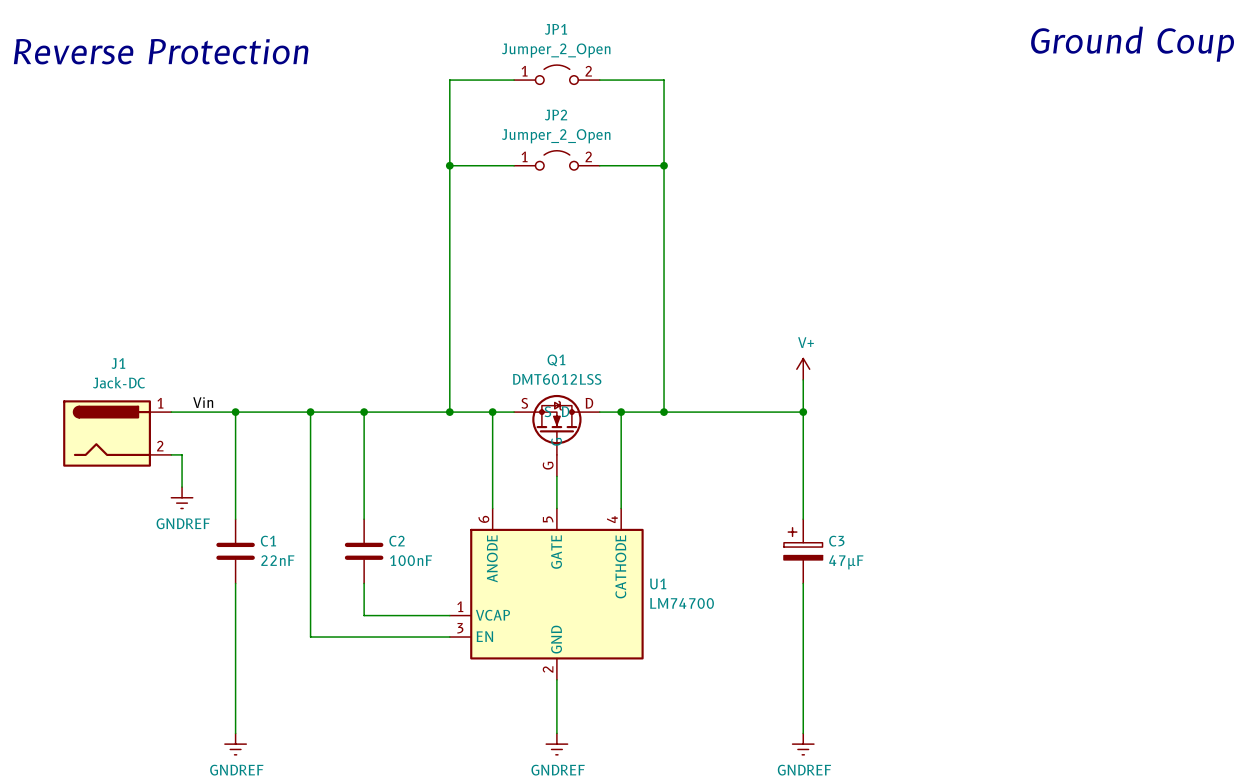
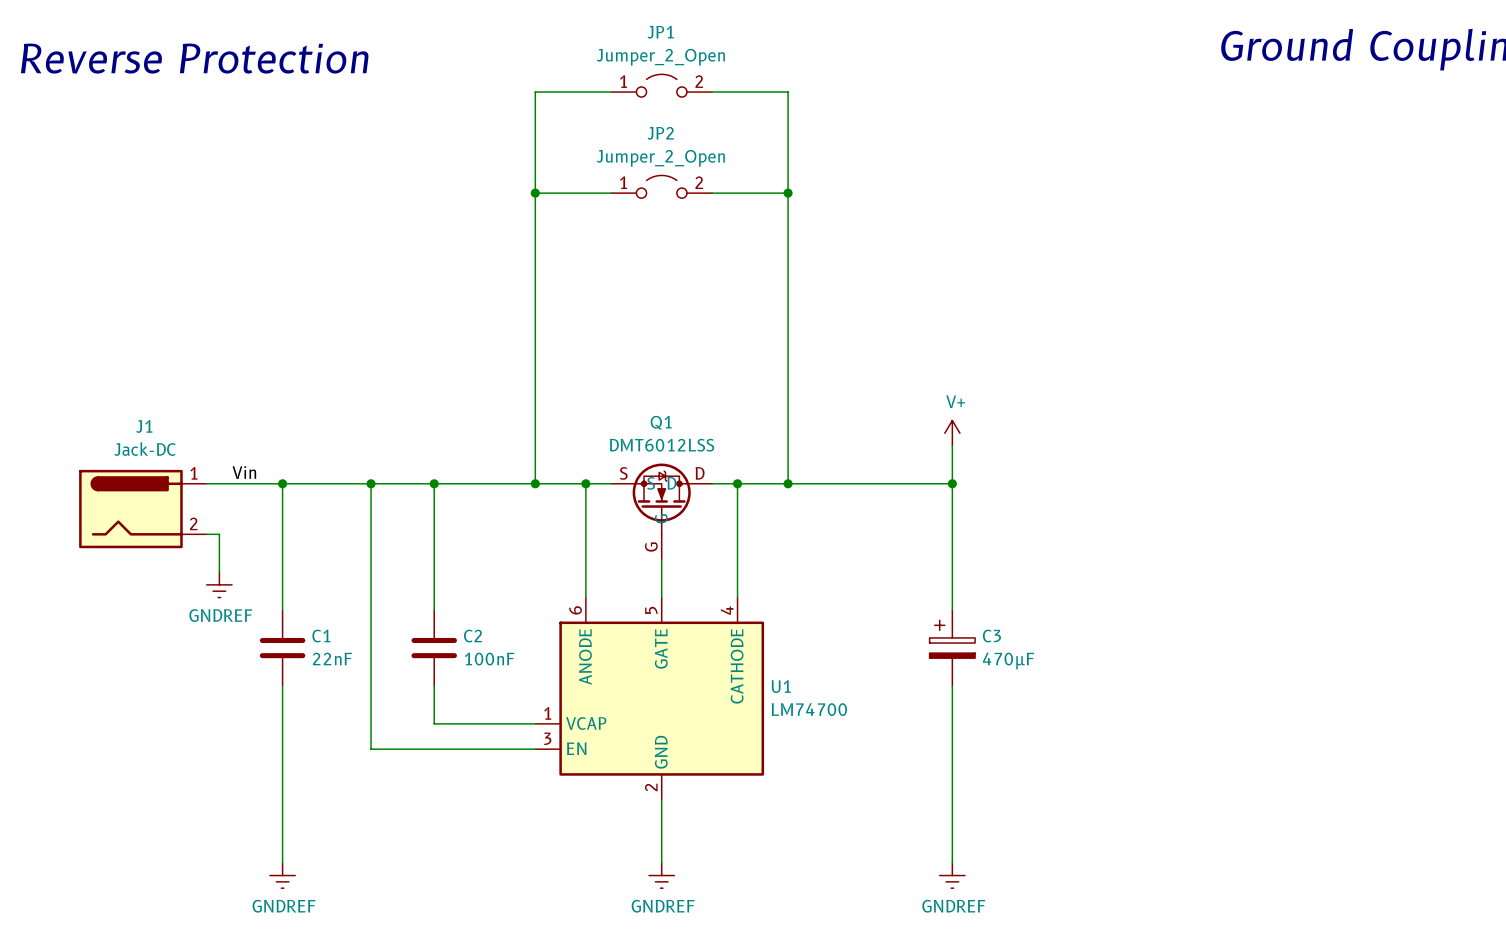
C3 value: 47µF (846, 562) -> 470µF (1008, 661)

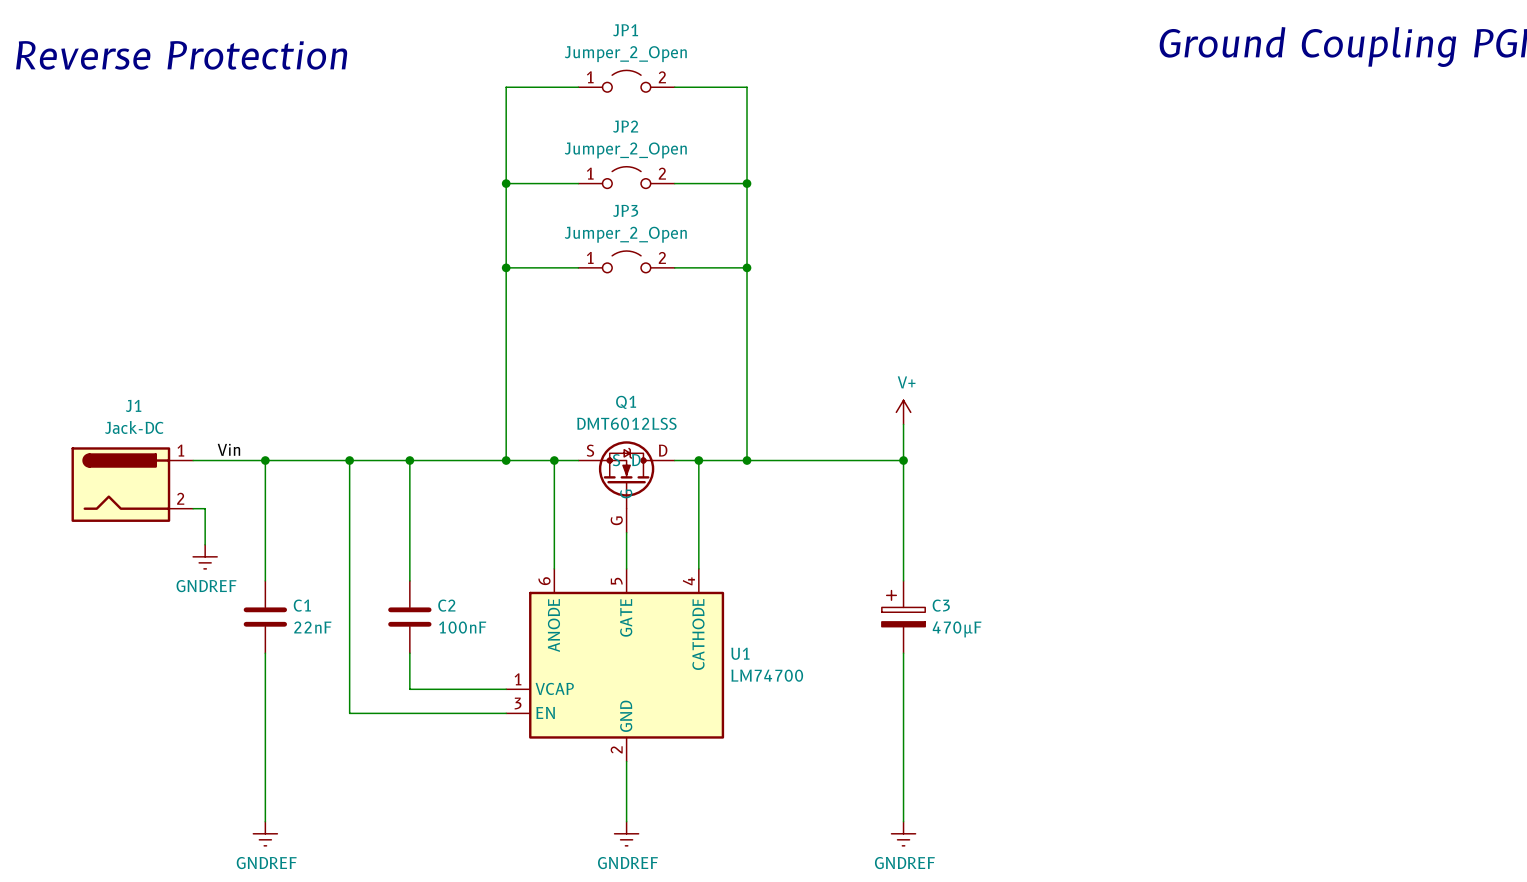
JP3: none -> Jumper_2_Open (626, 261)
wire: none -> (506, 267) (578, 267)
junction: none -> (506, 267)
wire: none -> (674, 267) (747, 267)
junction: none -> (747, 267)

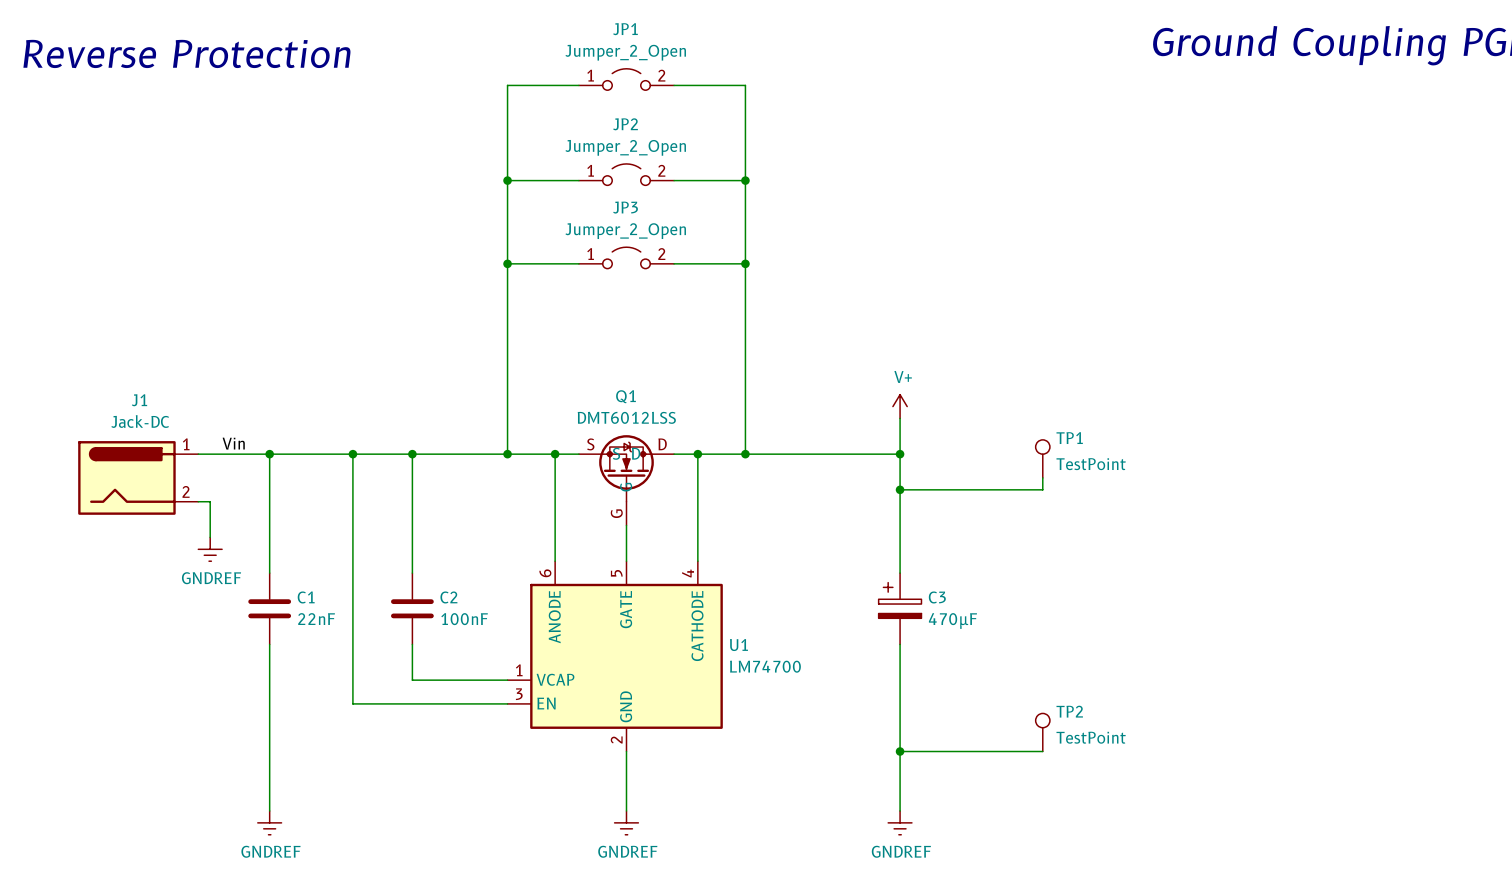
TP1: none -> TestPoint (1042, 458)
wire: none -> (1042, 477) (1042, 489) (900, 489)
junction: none -> (900, 489)
TP2: none -> TestPoint (1042, 732)
wire: none -> (900, 751) (1042, 751)
junction: none -> (900, 751)

